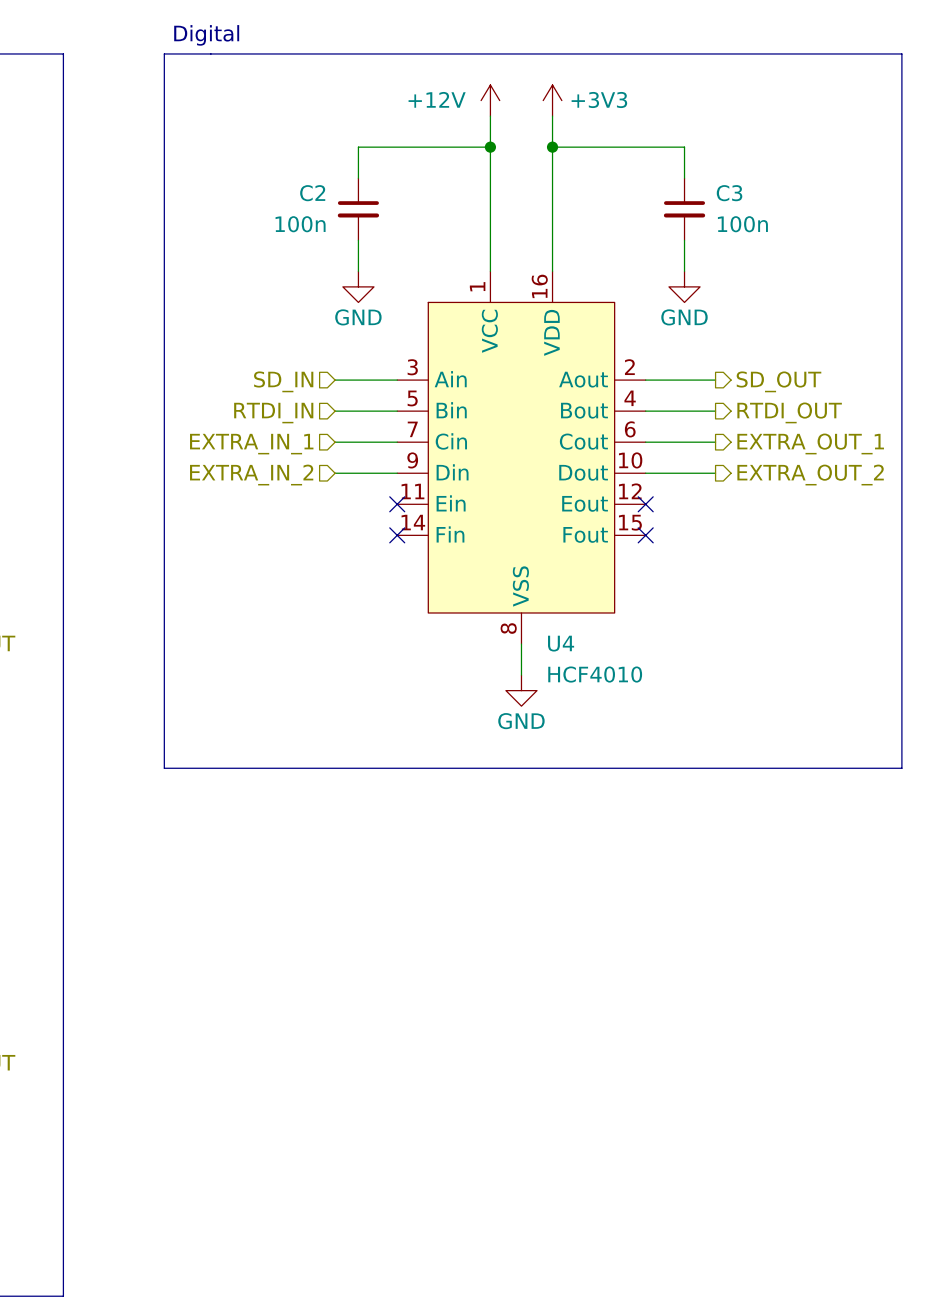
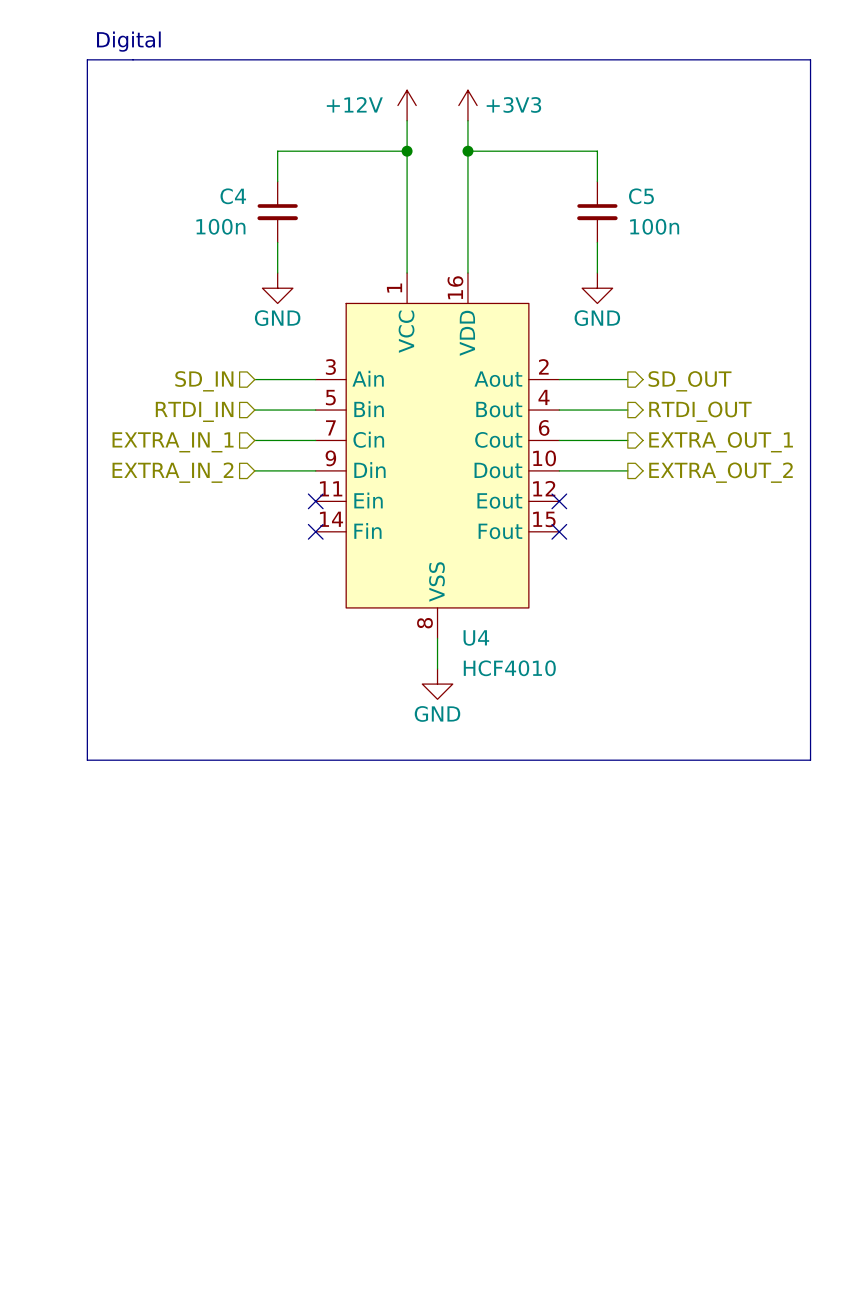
C2 name: C2 (312, 193) -> C4 (233, 196)
C3 name: C3 (729, 193) -> C5 (641, 196)

